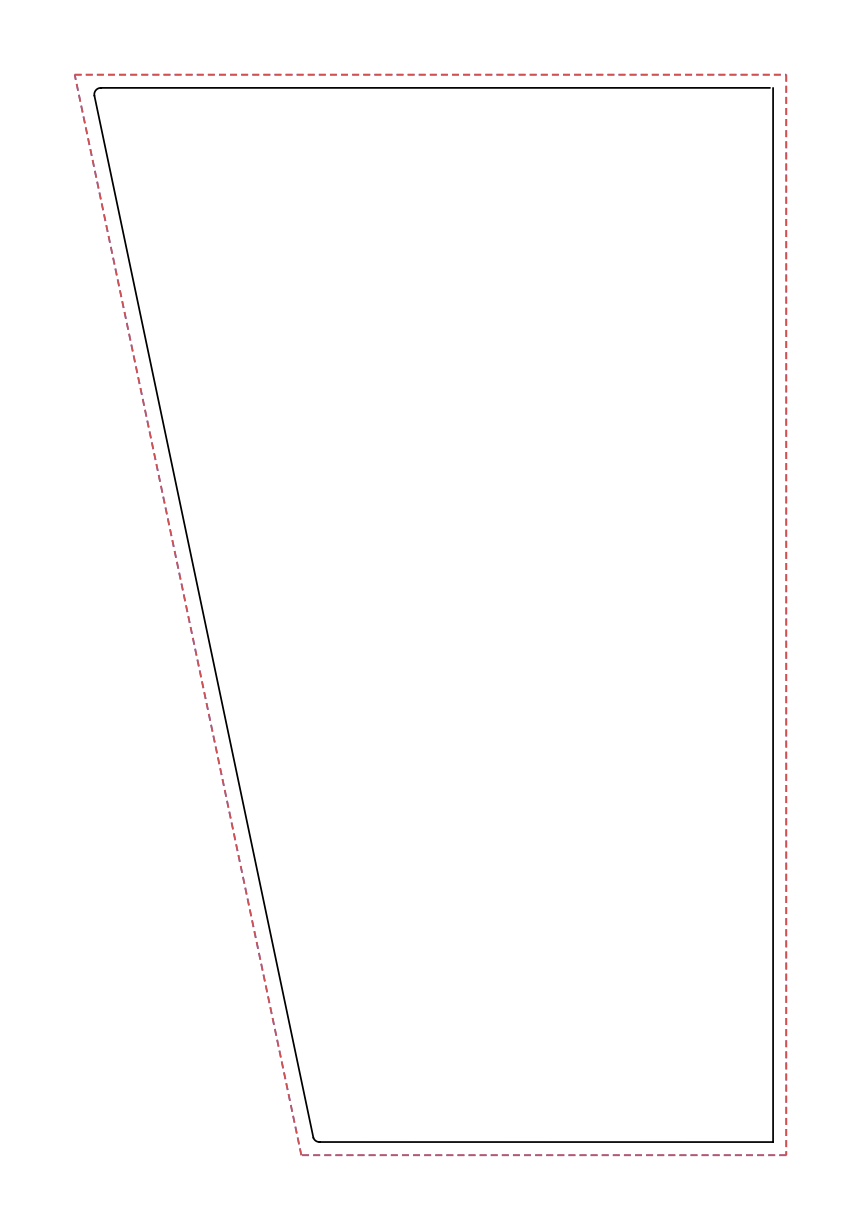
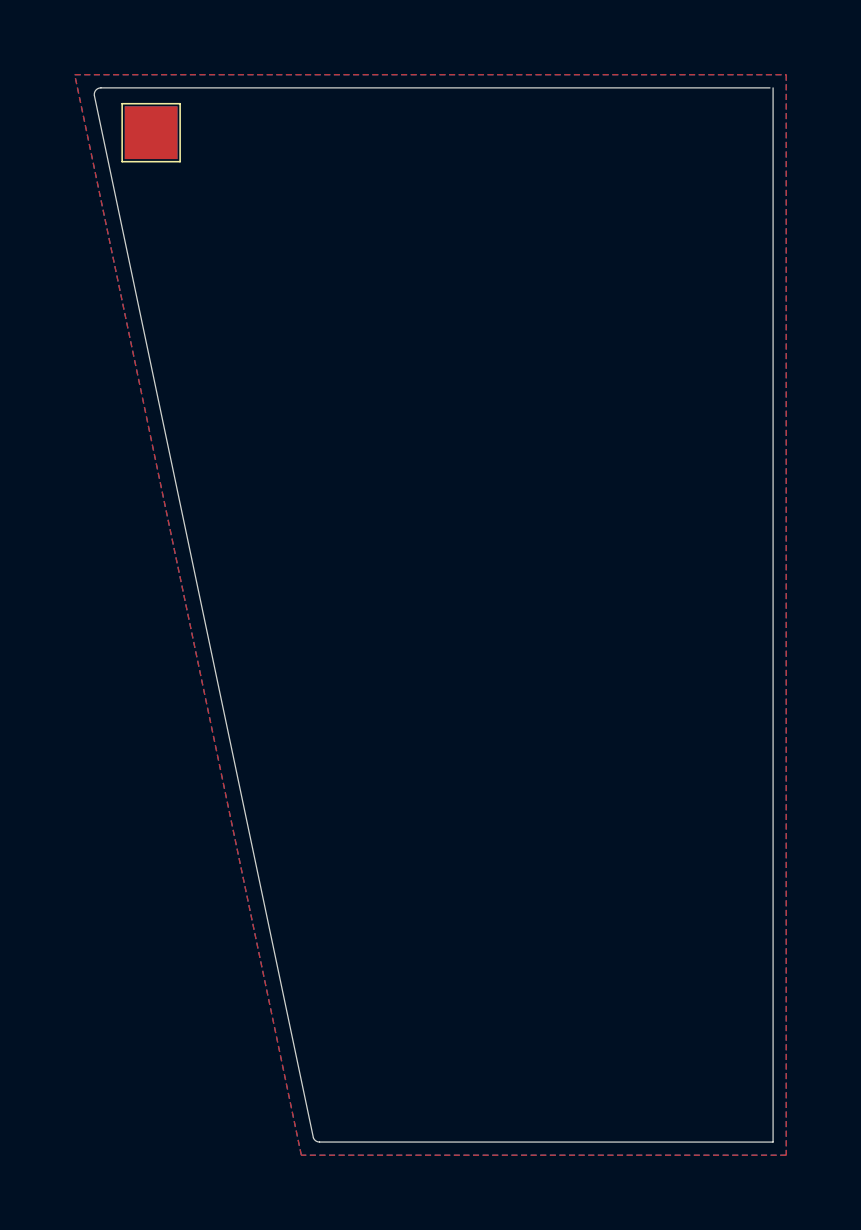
part: none -> (151, 132)

